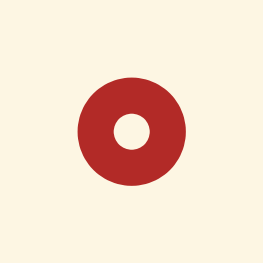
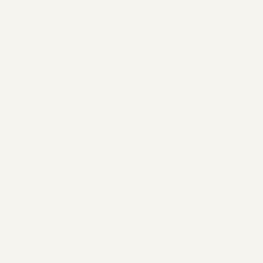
part: (131, 131) -> none

